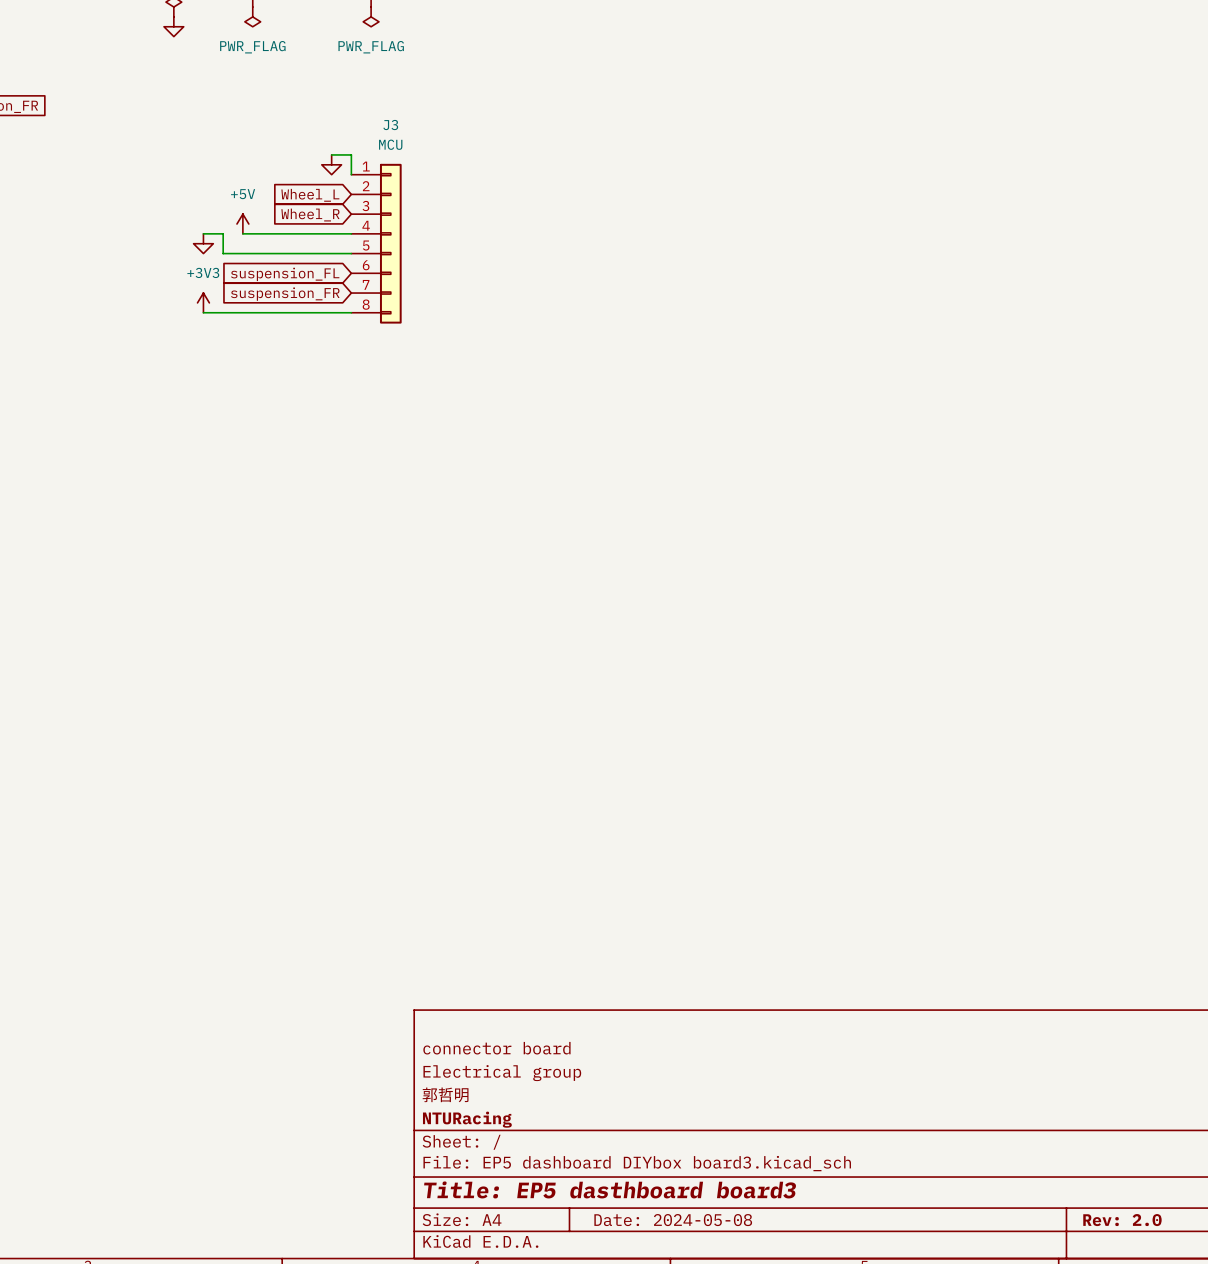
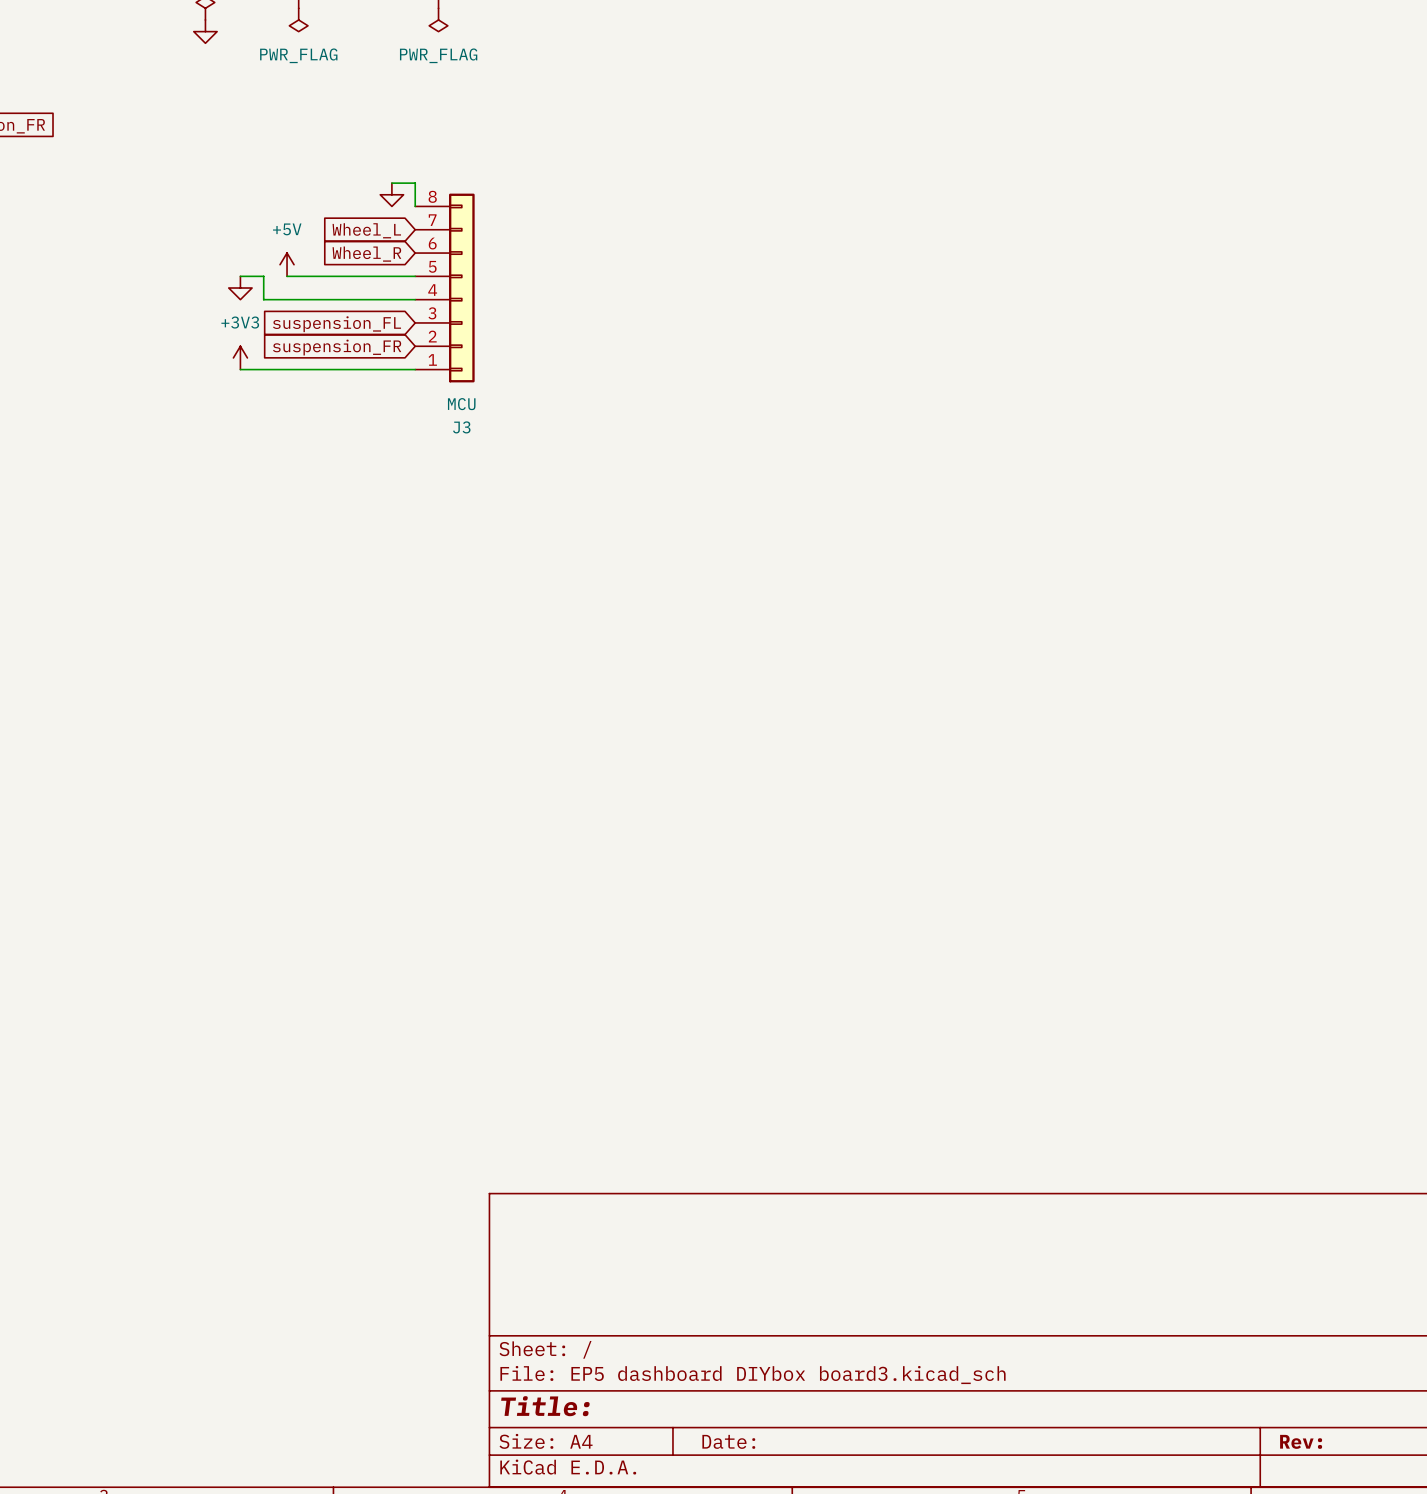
J3 flip: as is (390, 243) -> up-down (461, 288)
title block: connector board (496, 1048) -> none
title block: Electrical group (502, 1073) -> none
title block: 郭哲明 (445, 1094) -> none
title block: NTURacing (467, 1119) -> none
title block: Title: EP5 dasthboard board3 (610, 1189) -> Title: (545, 1406)
title block: Date: 2024-05-08 (673, 1220) -> Date: (728, 1441)
title block: Rev: 2.0 (1122, 1220) -> Rev: (1301, 1441)

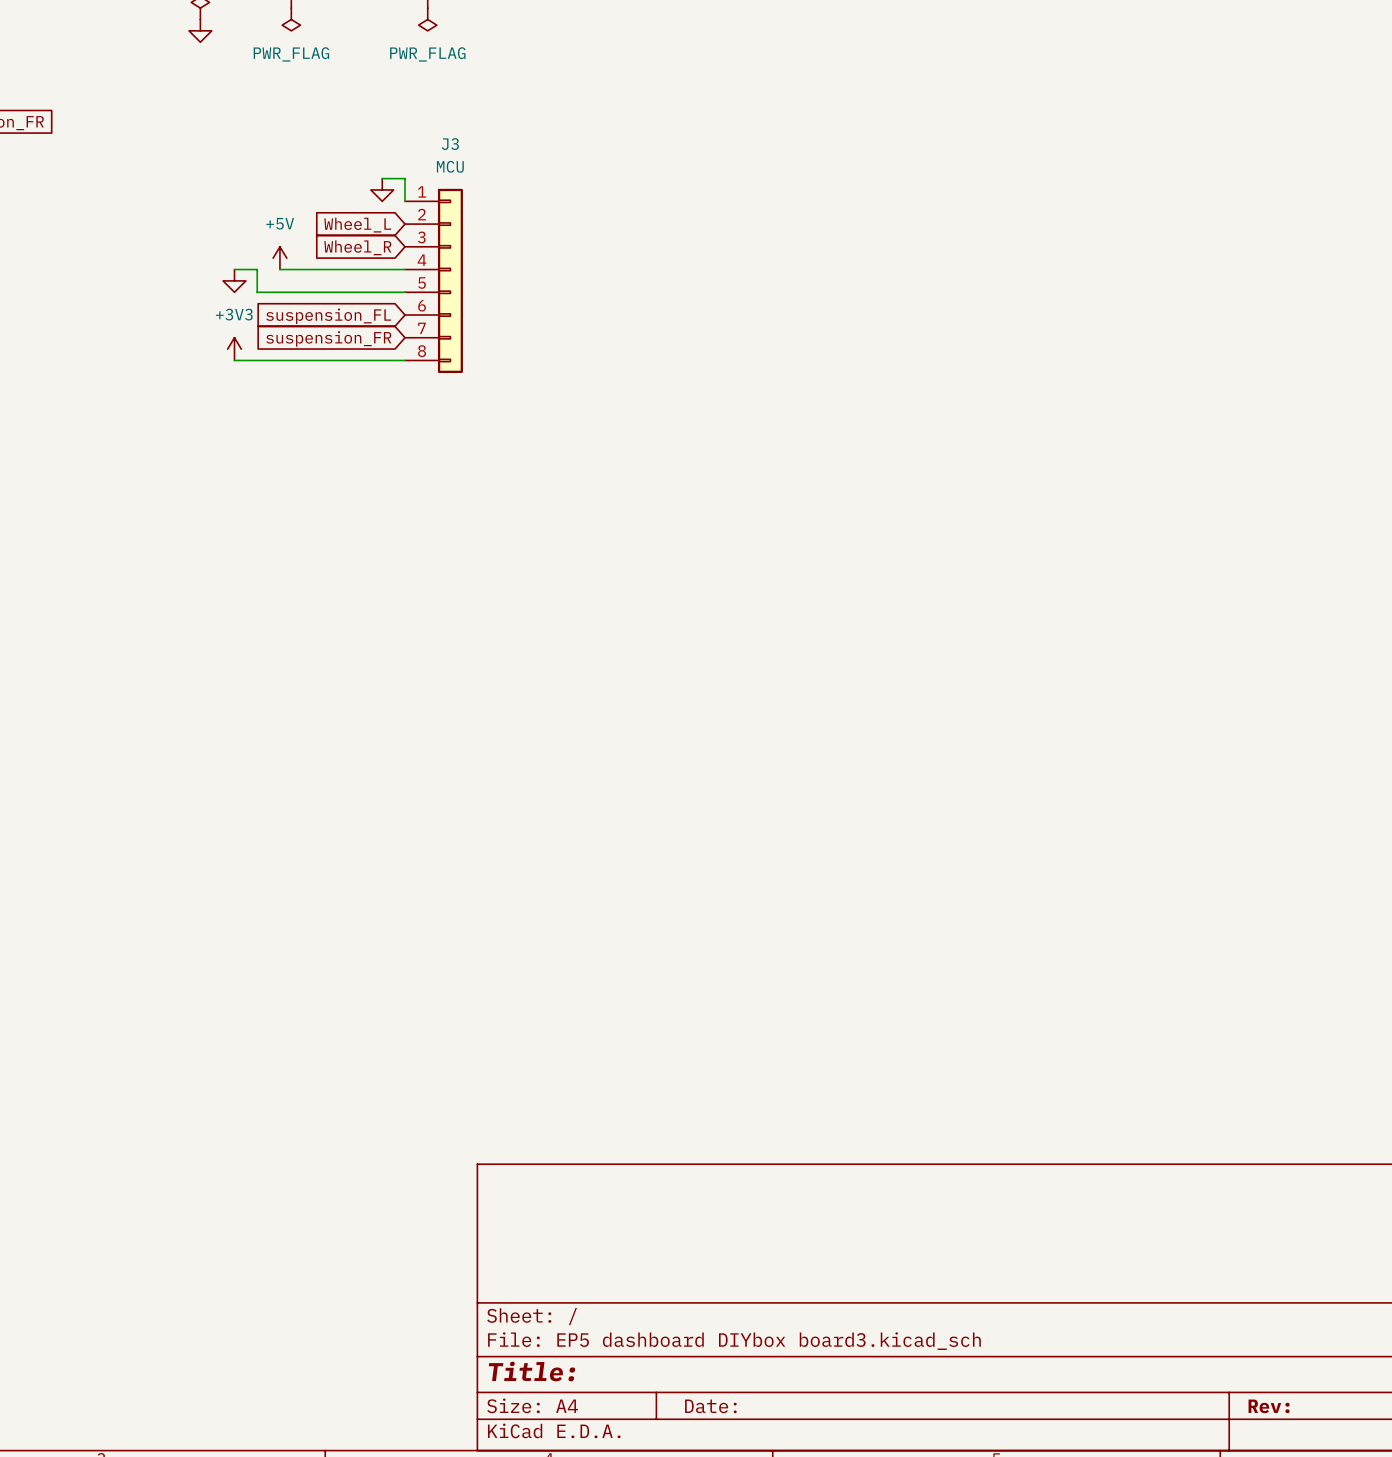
J3 flip: as is (461, 288) -> up-down (450, 280)

